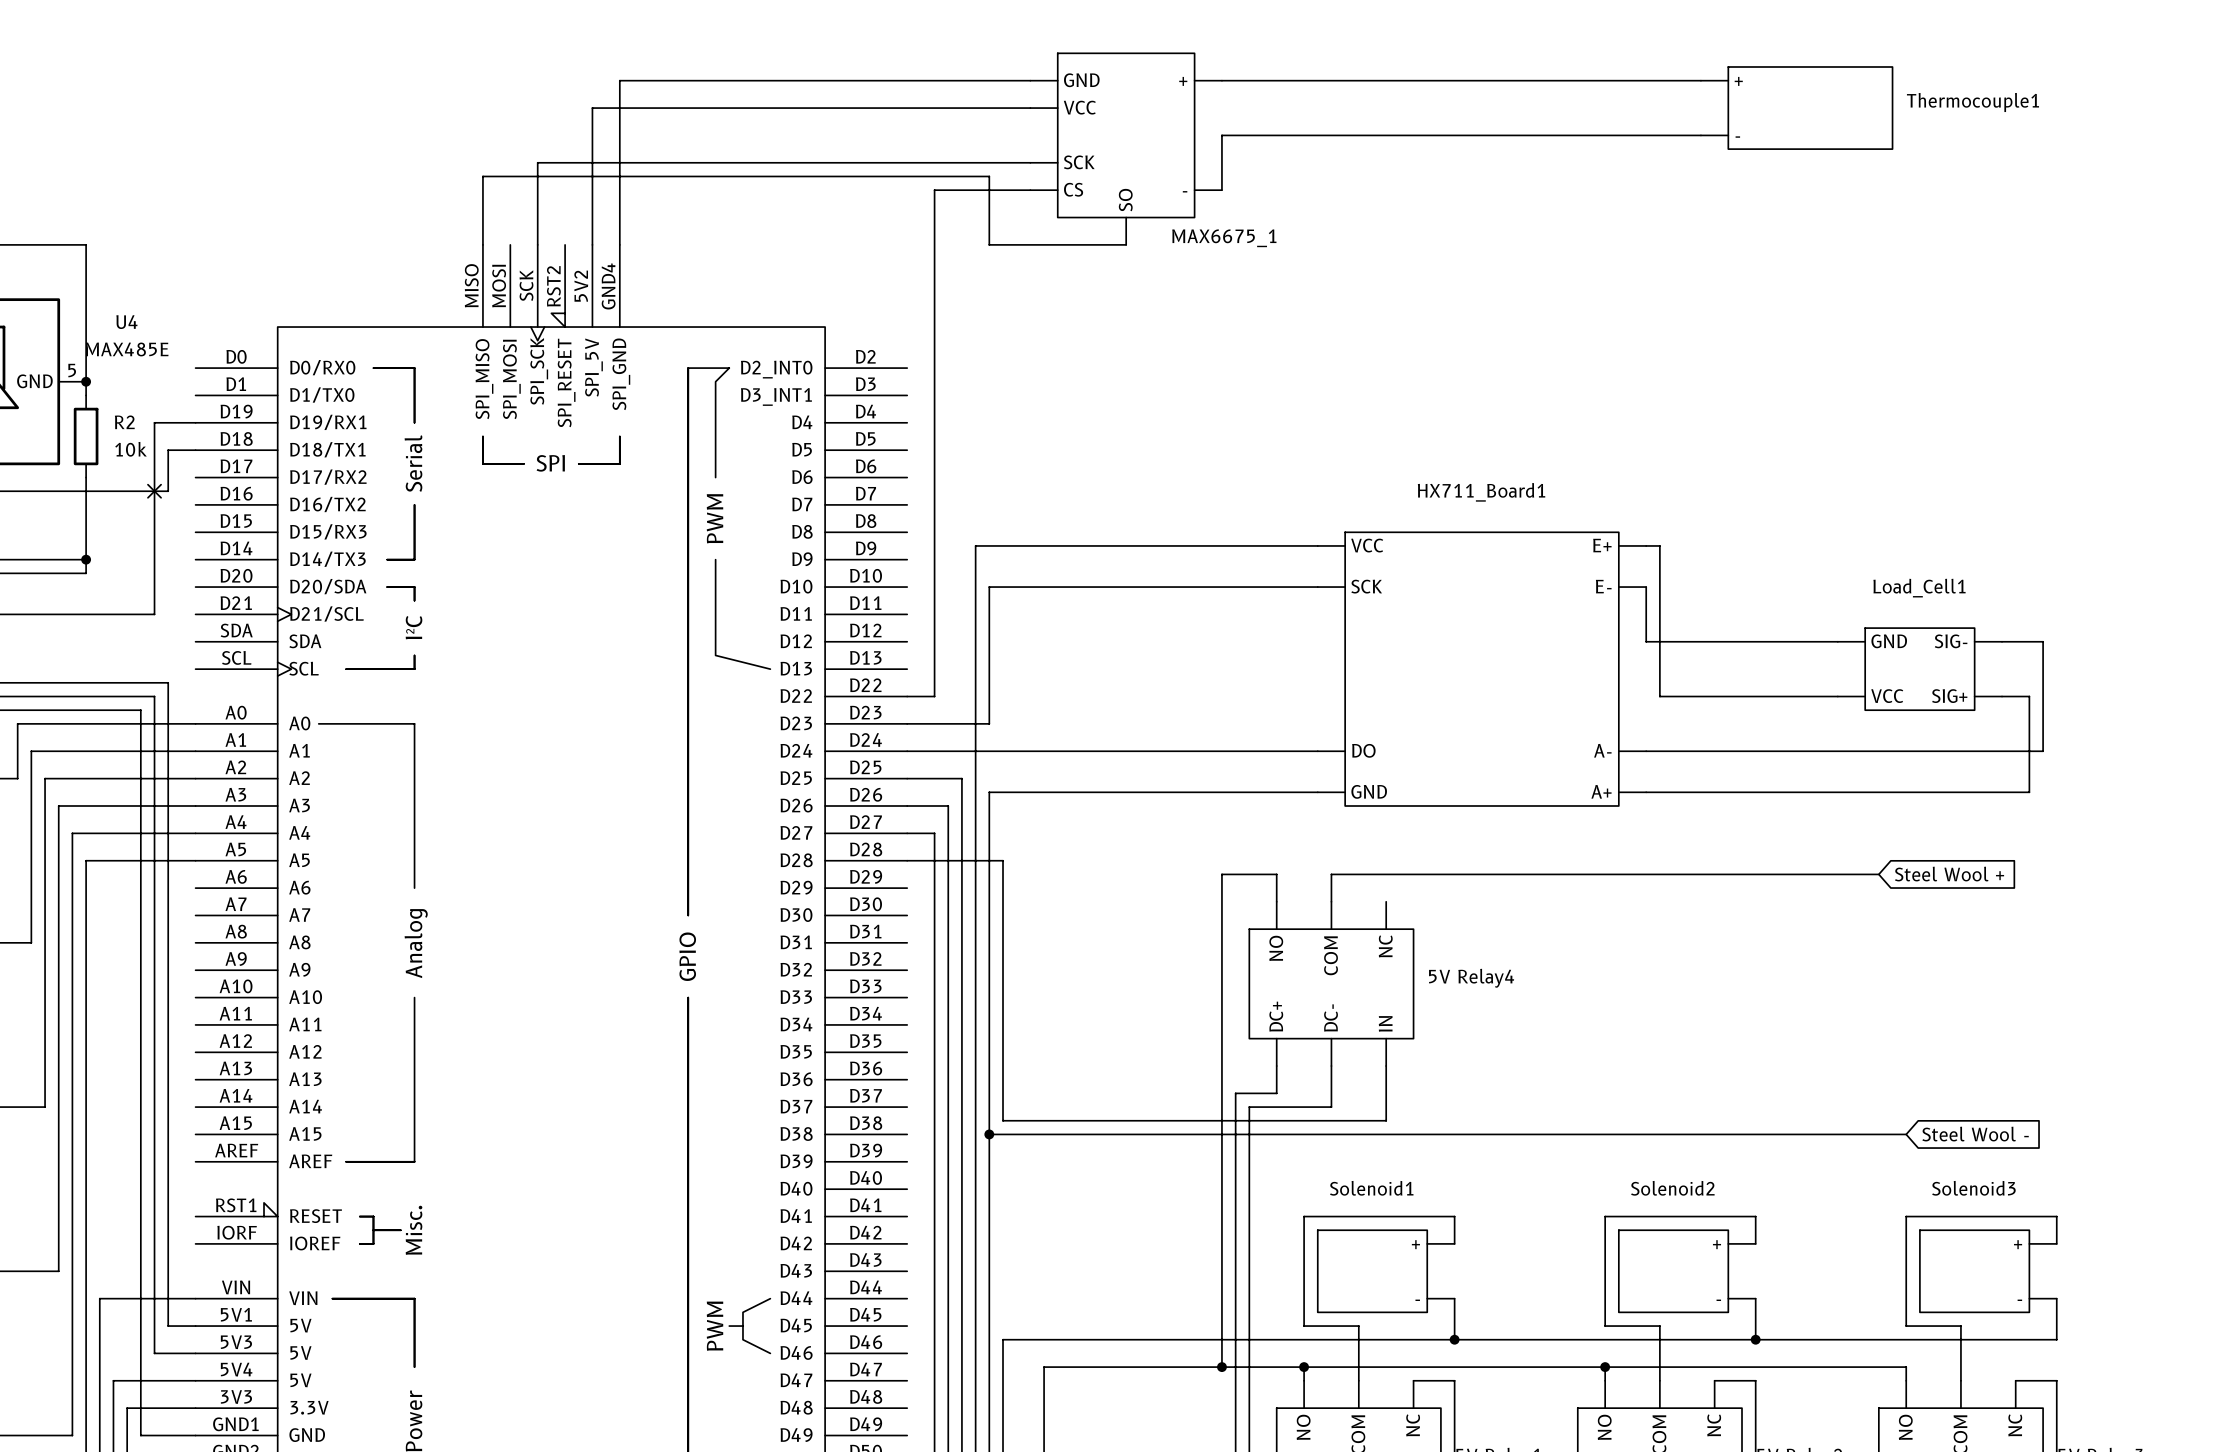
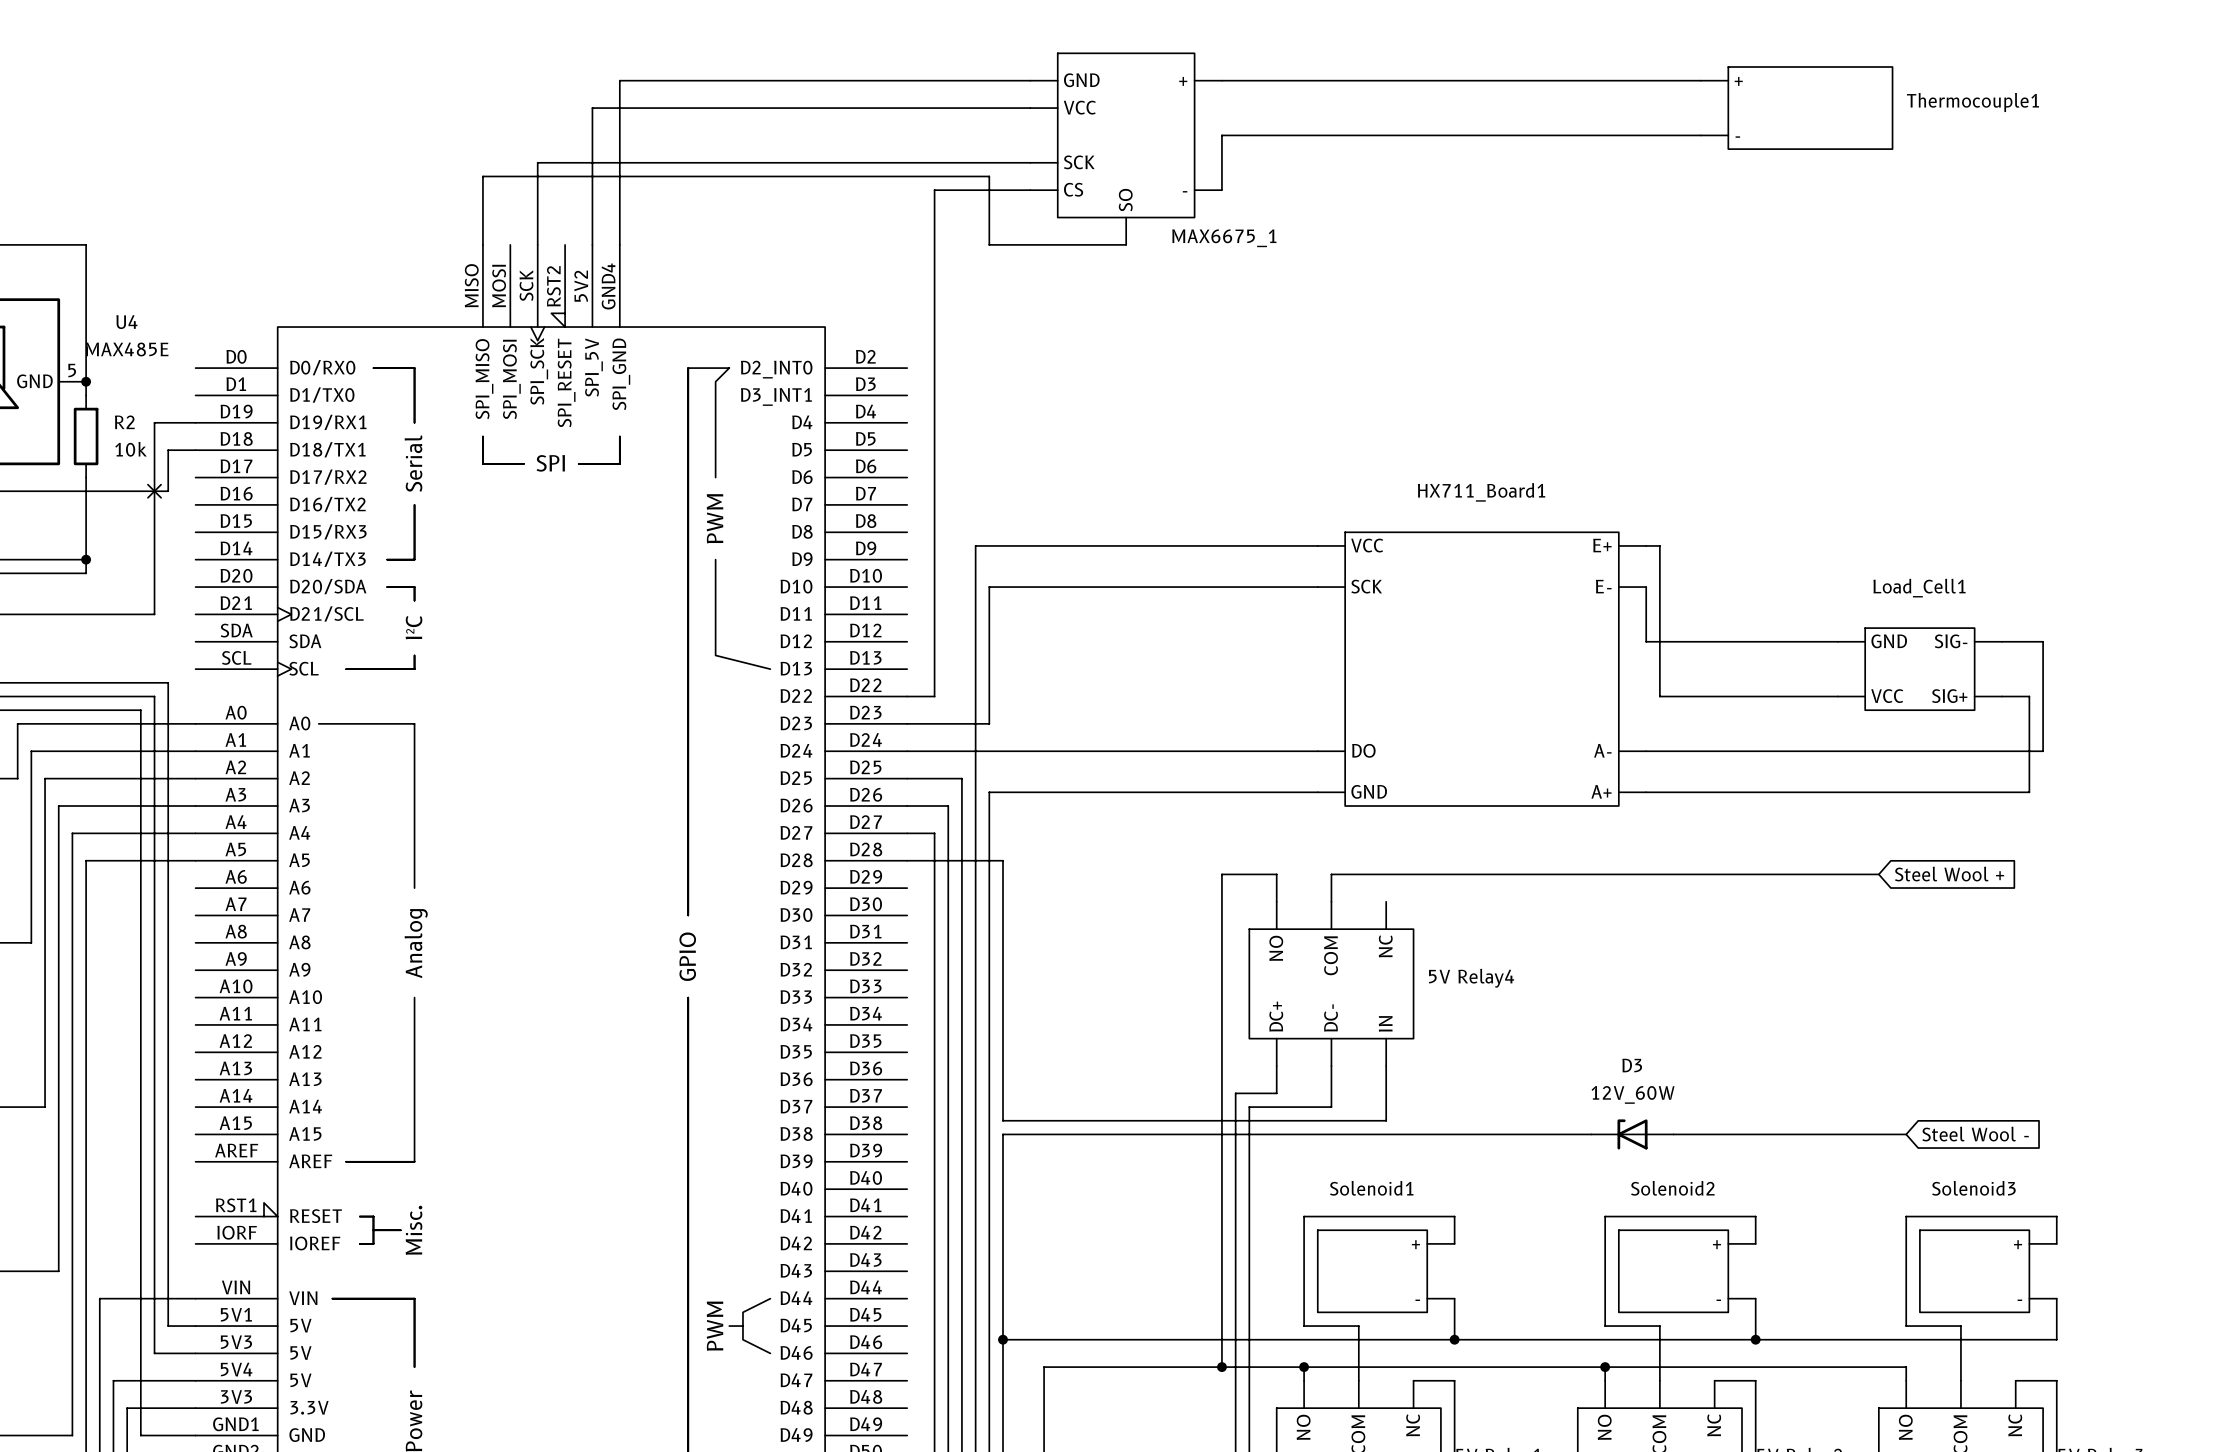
wire: (989, 1134) (1003, 1134) -> (1003, 1339) (1003, 1134)
junction: (989, 1134) -> none
D3: none -> 12V_60W (1632, 1134)
junction: none -> (1003, 1339)

